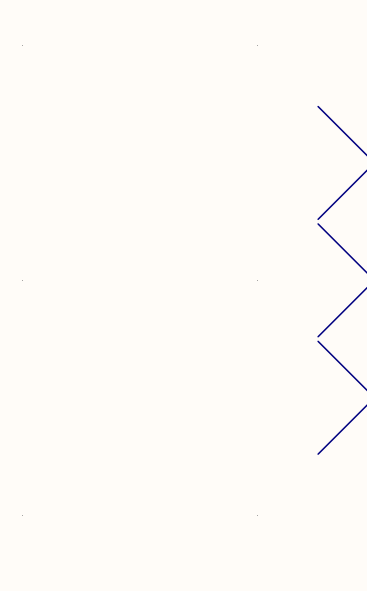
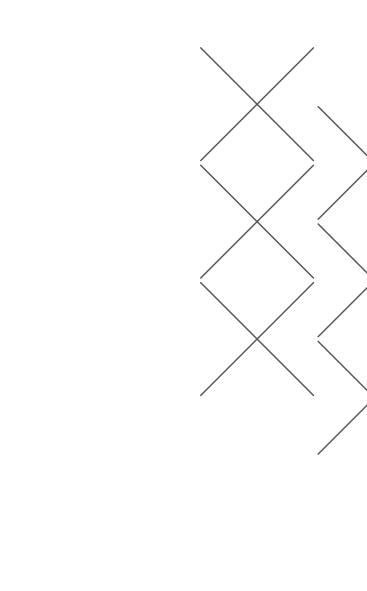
no-connect mark: none -> (257, 104)
no-connect mark: none -> (257, 221)
no-connect mark: none -> (257, 339)

